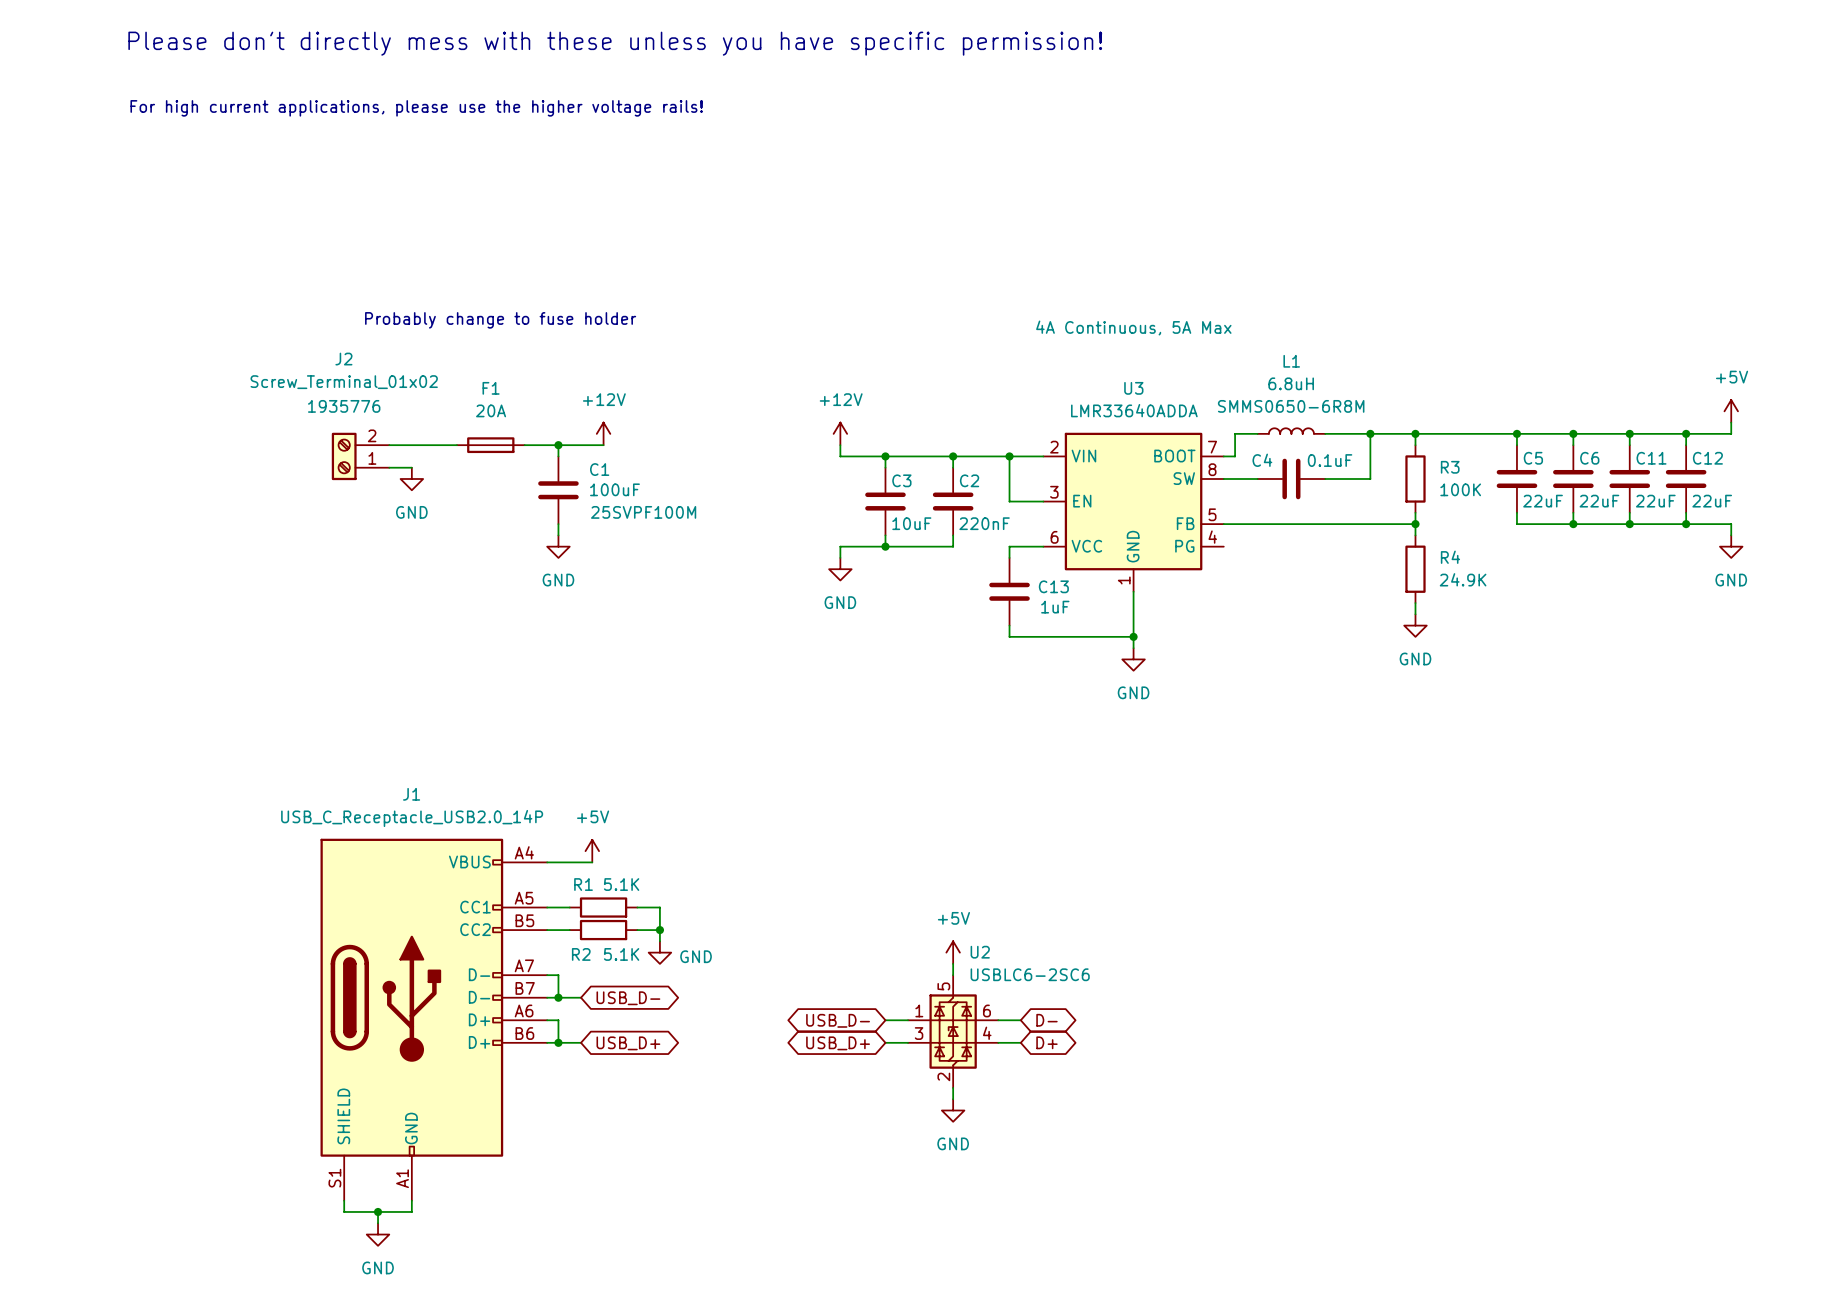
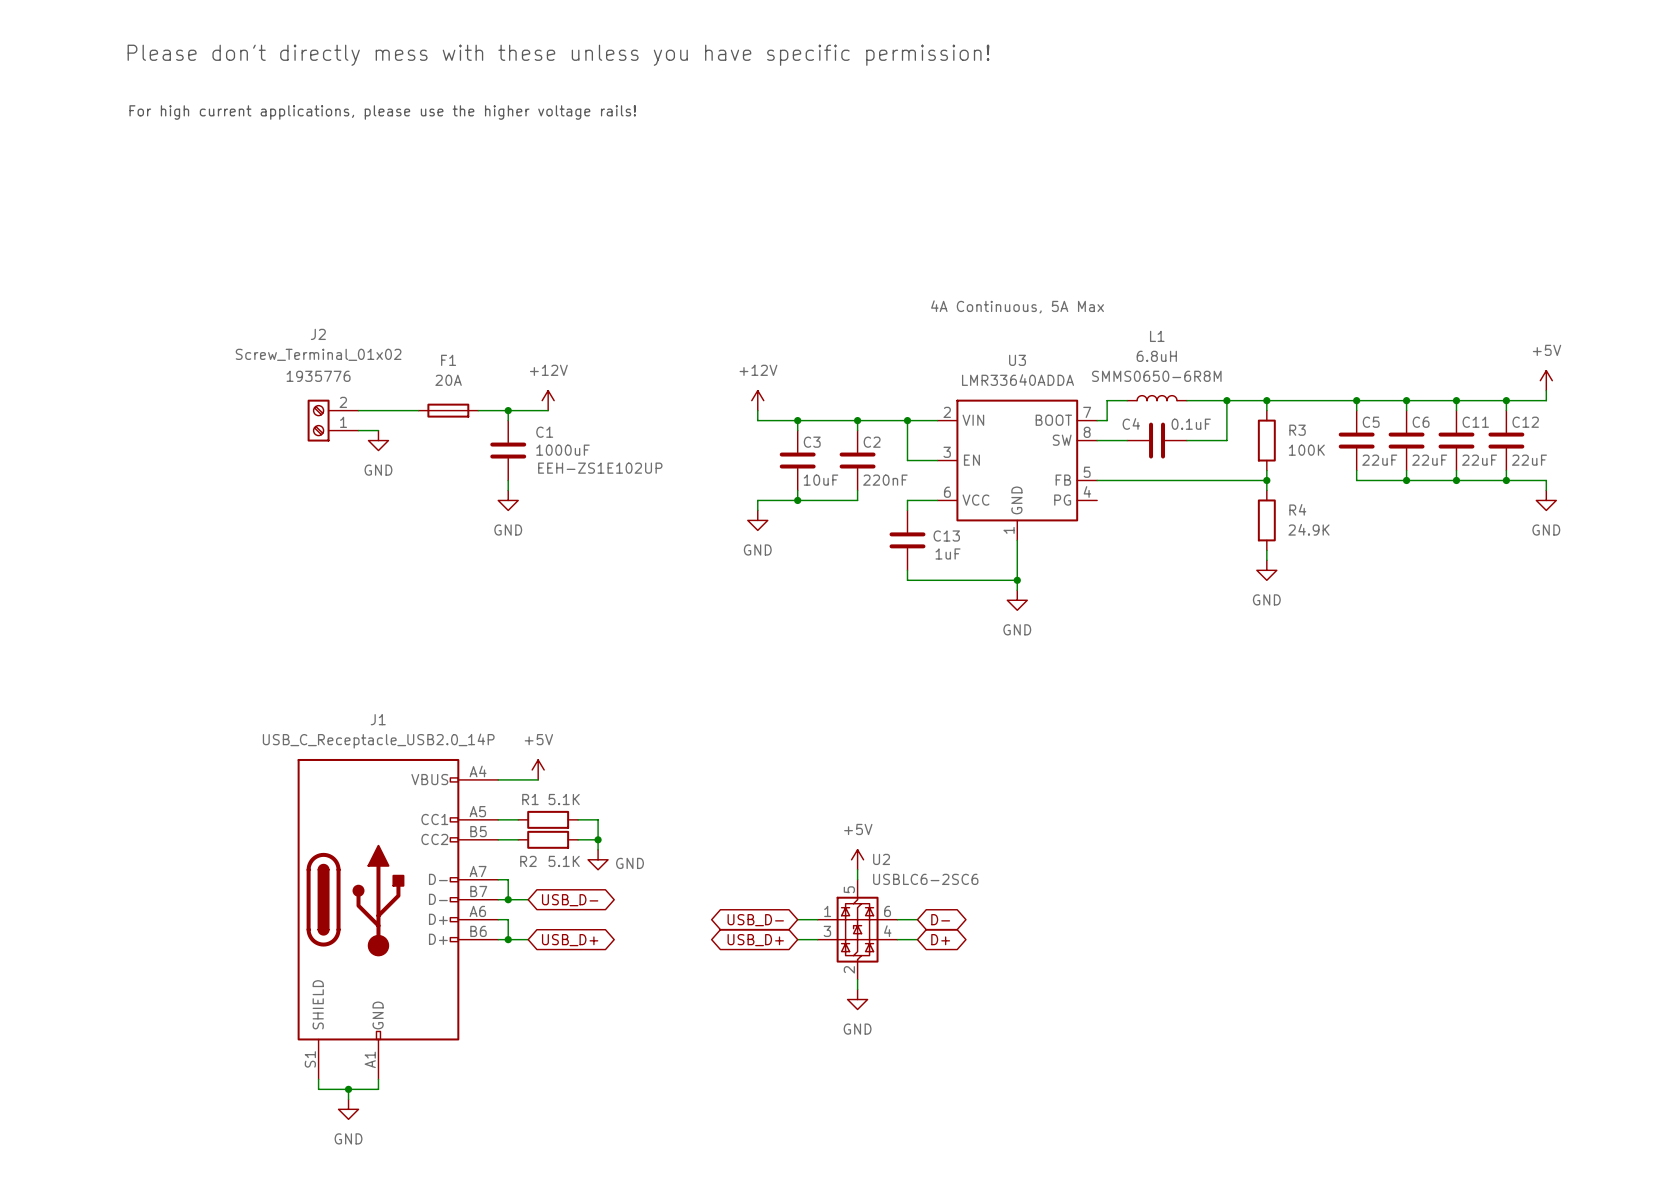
text: Probably change to fuse holder (500, 320) -> none
C1 value: 100uF (614, 489) -> 1000uF (563, 450)
C1 text: 25SVPF100M (643, 512) -> EEH-ZS1E102UP (600, 468)

